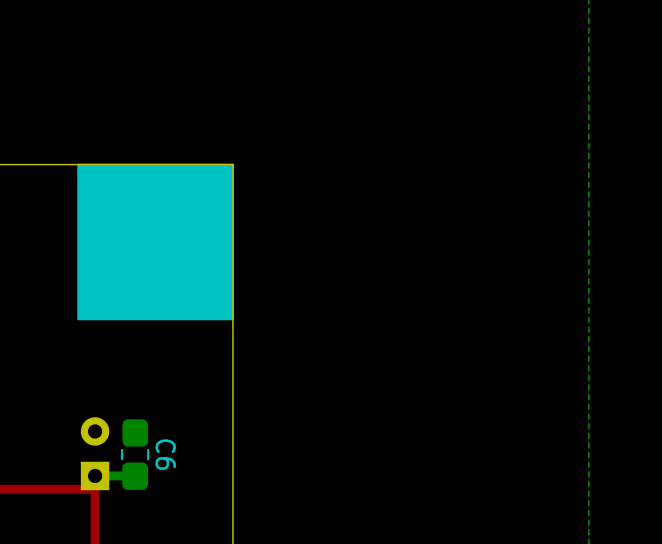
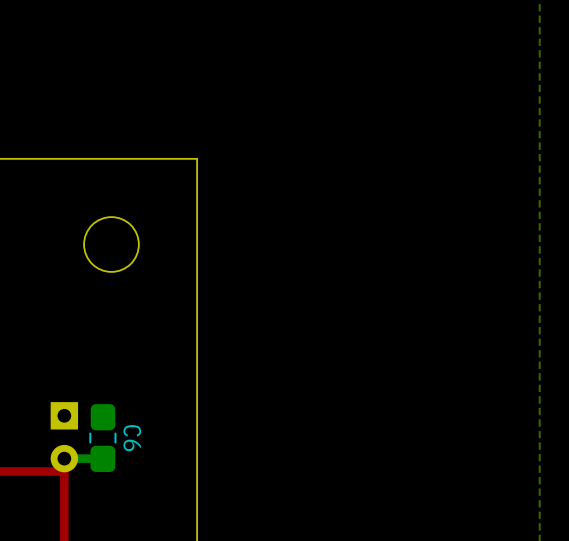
drawing: [77, 163, 234, 321] -> none
part rotation: 0° (95, 453) -> 180° (64, 437)

